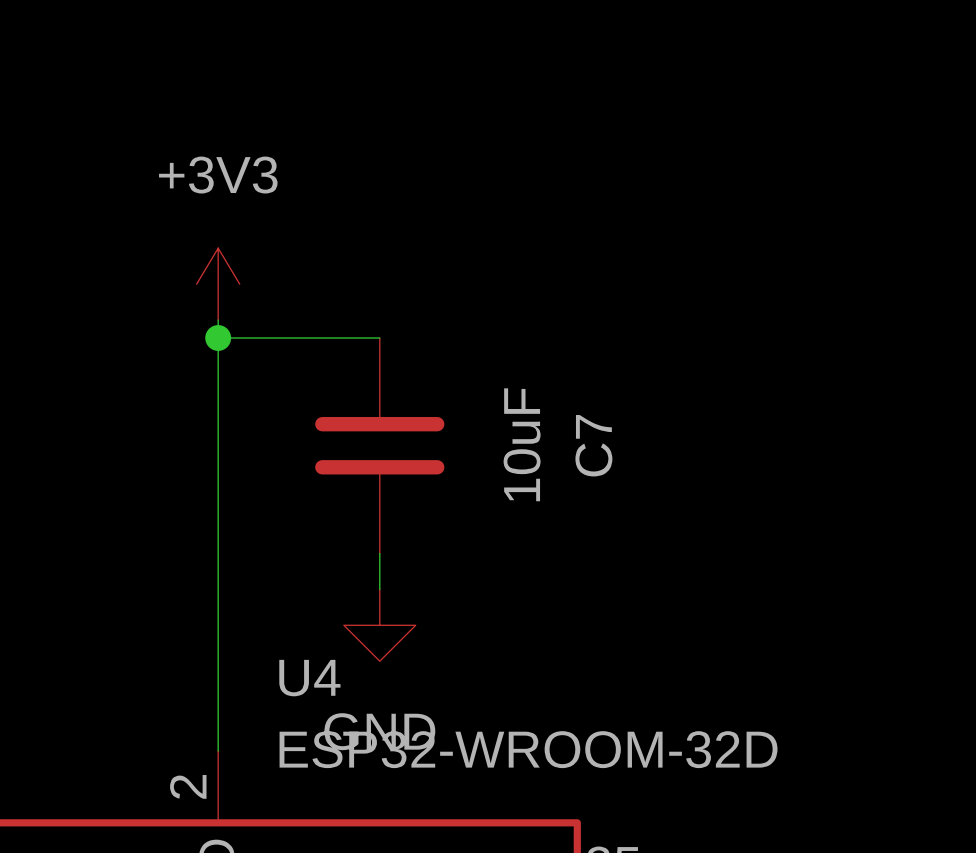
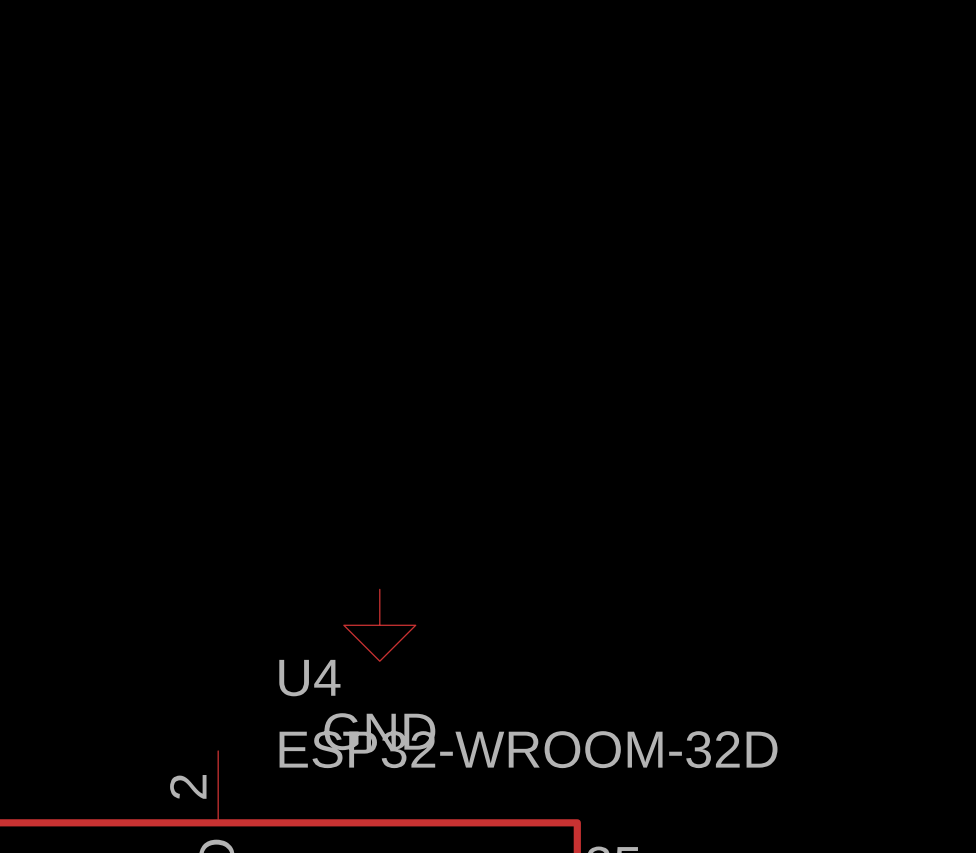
power symbol: +3V3 (218, 284) -> none
wire: (218, 320) (218, 750) -> none
wire: (218, 338) (379, 338) -> none
junction: (218, 338) -> none
C7: 10uF (379, 445) -> none
wire: (379, 553) (379, 589) -> none

